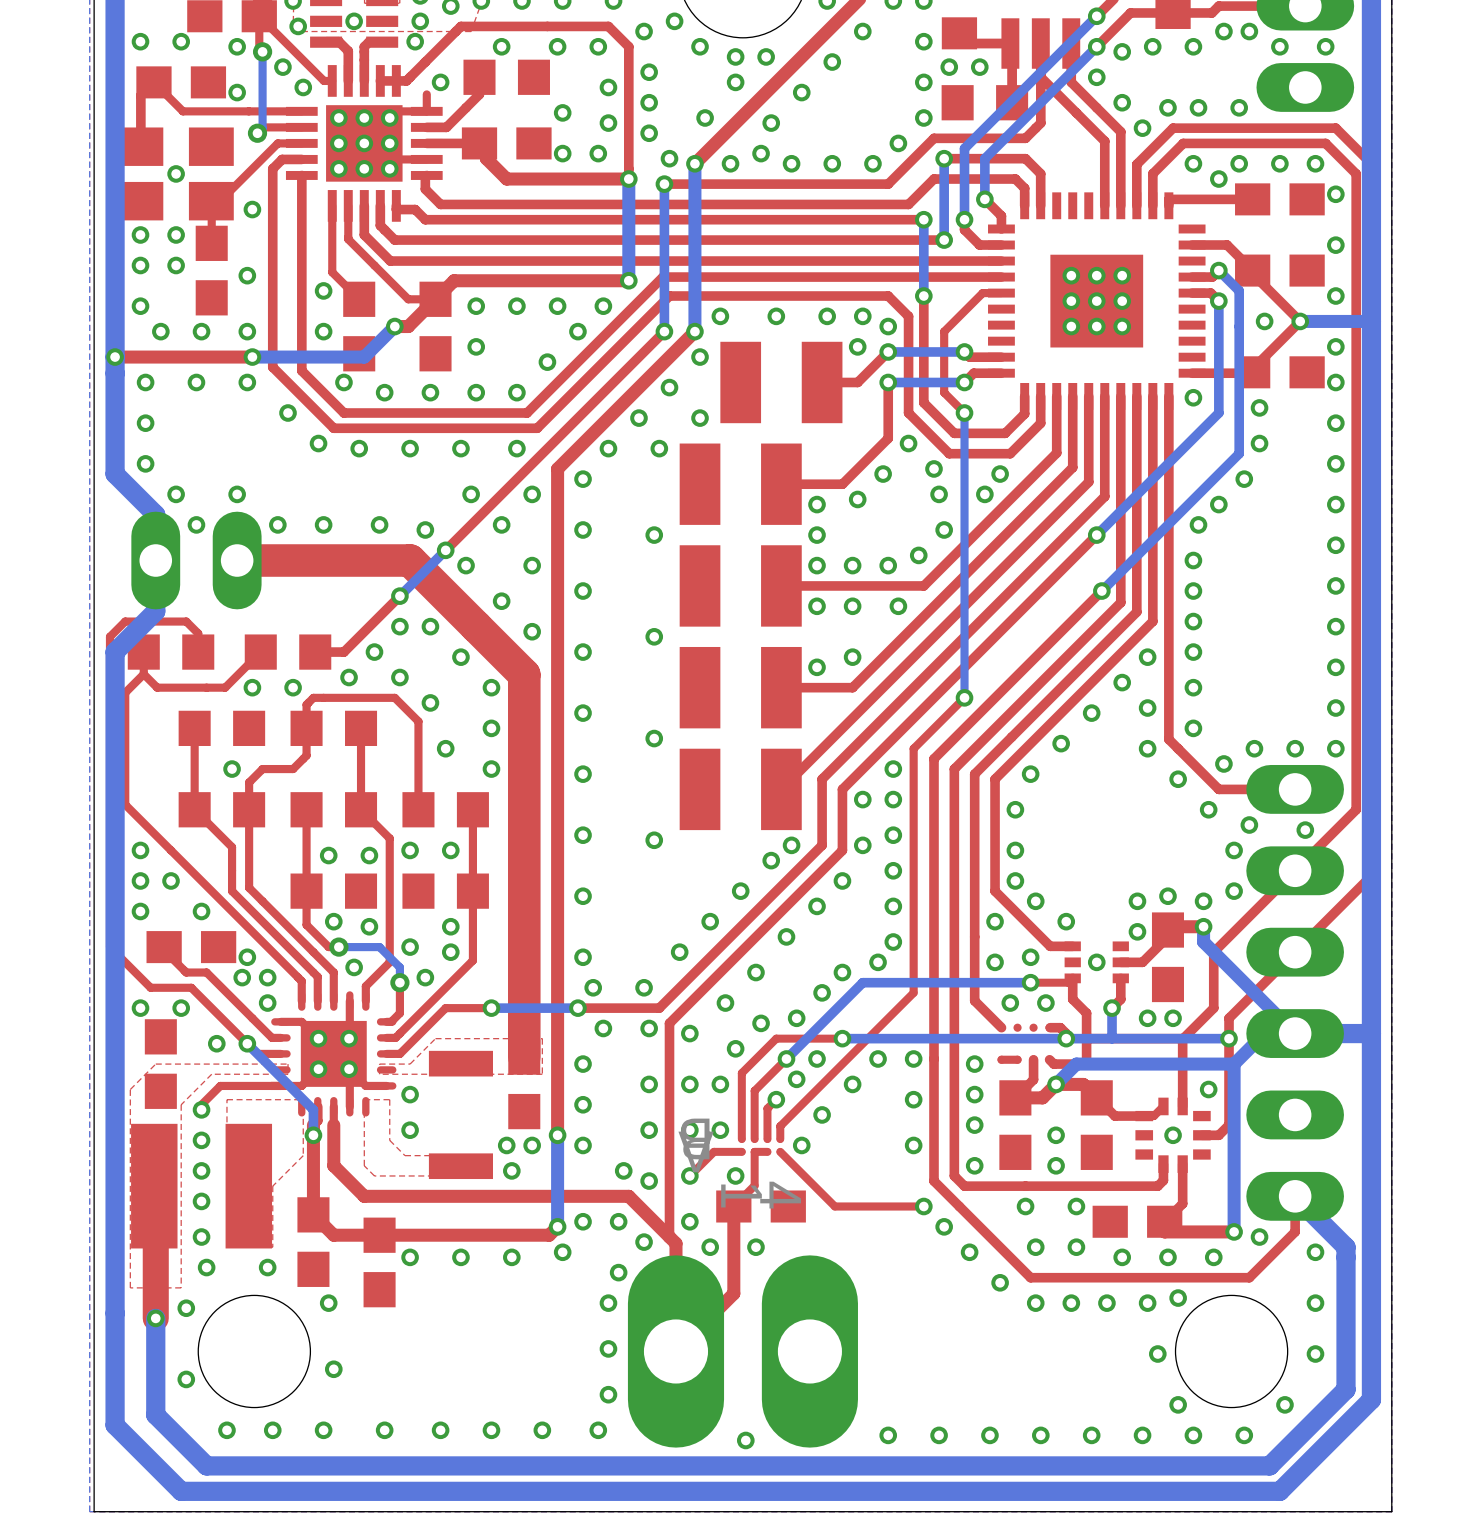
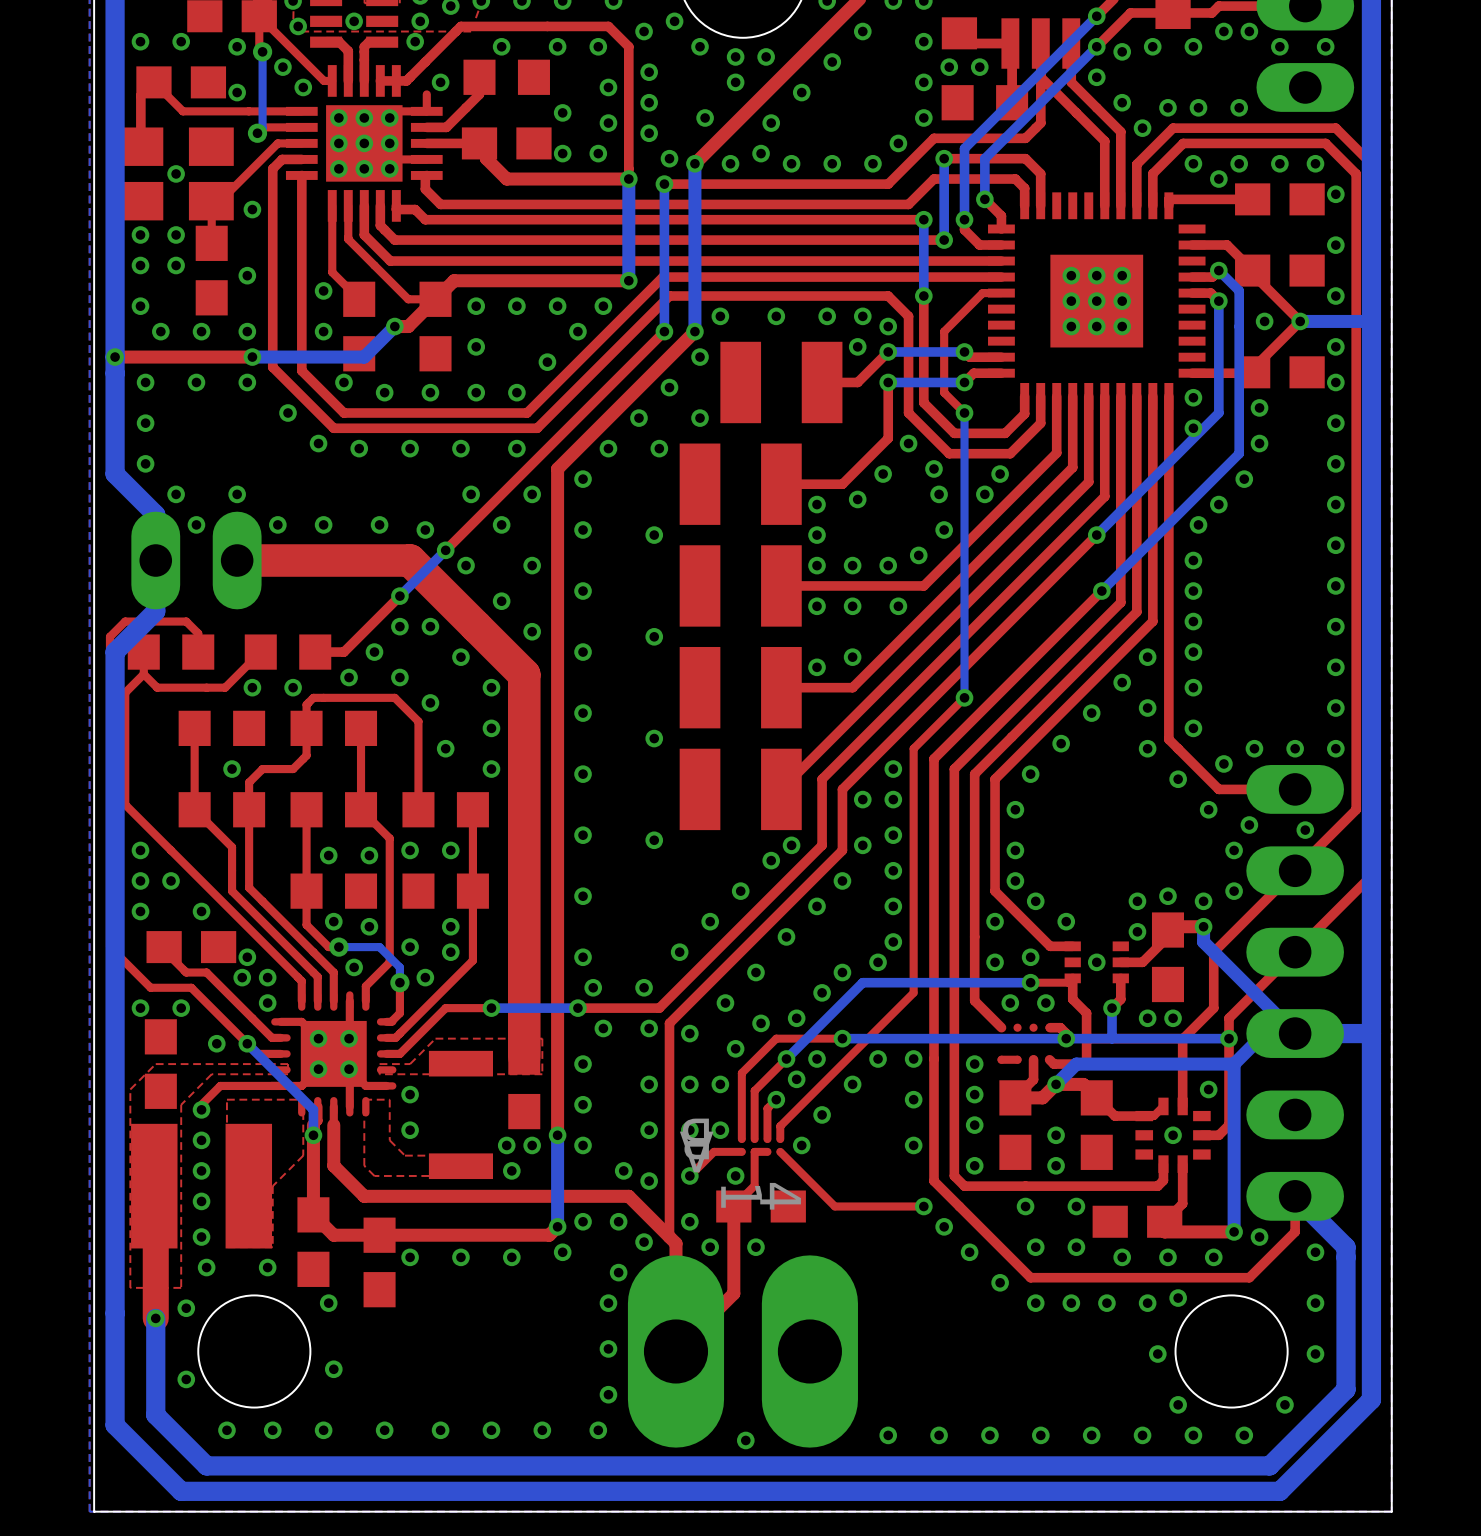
via: none -> (1193, 428)

